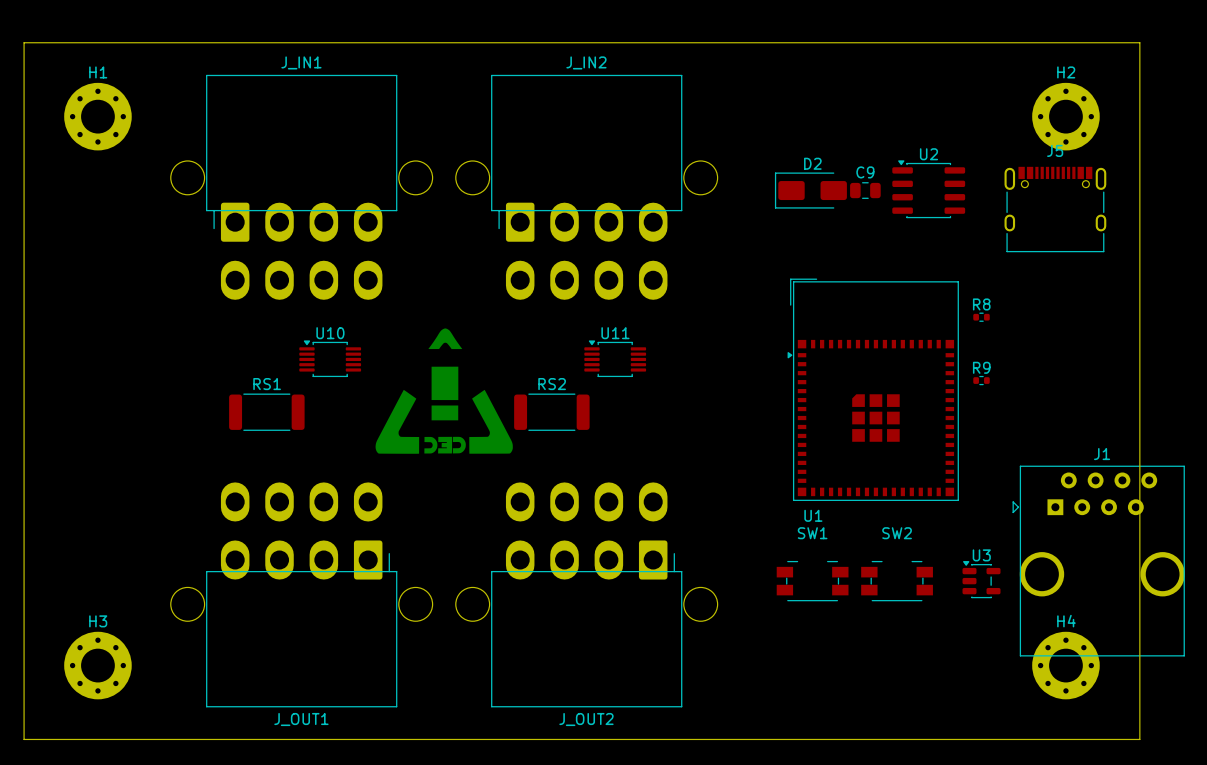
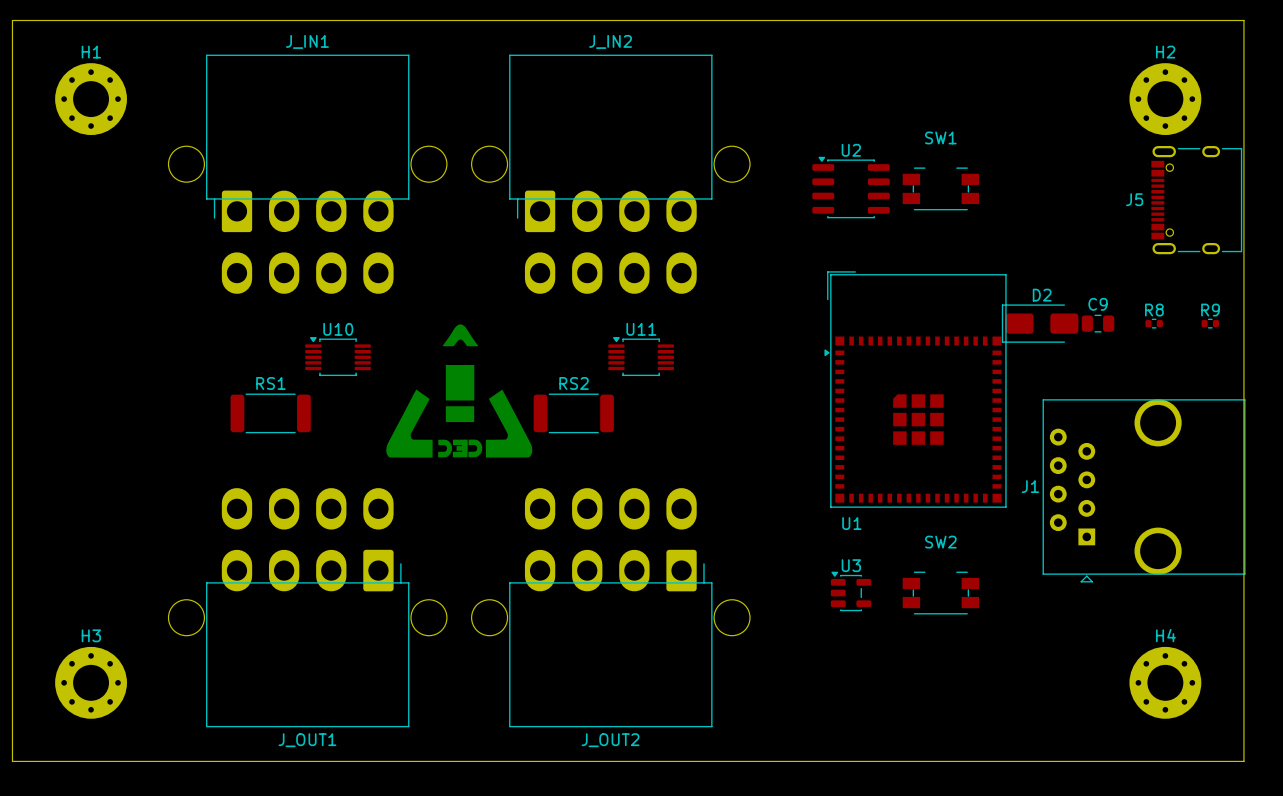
board edge: (1139, 42) (1139, 739) -> (1199, 20) (1243, 20) (1243, 761) (1199, 761)
H2 position: (1065, 116) -> (1165, 99)
U2 position: (928, 189) -> (851, 187)
D2 position: (810, 190) -> (1040, 323)
C9 position: (865, 190) -> (1098, 323)
J5 rotation: 0° (1055, 209) -> 90° counterclockwise (1196, 200)
J5 position: (1055, 209) -> (1196, 200)
R8 position: (981, 317) -> (1154, 323)
R9 position: (981, 380) -> (1210, 323)
J1 rotation: 0° (1098, 561) -> 90° counterclockwise (1144, 490)
U3 position: (981, 579) -> (851, 591)
SW1 position: (812, 581) -> (940, 188)
H4 position: (1065, 665) -> (1165, 682)

